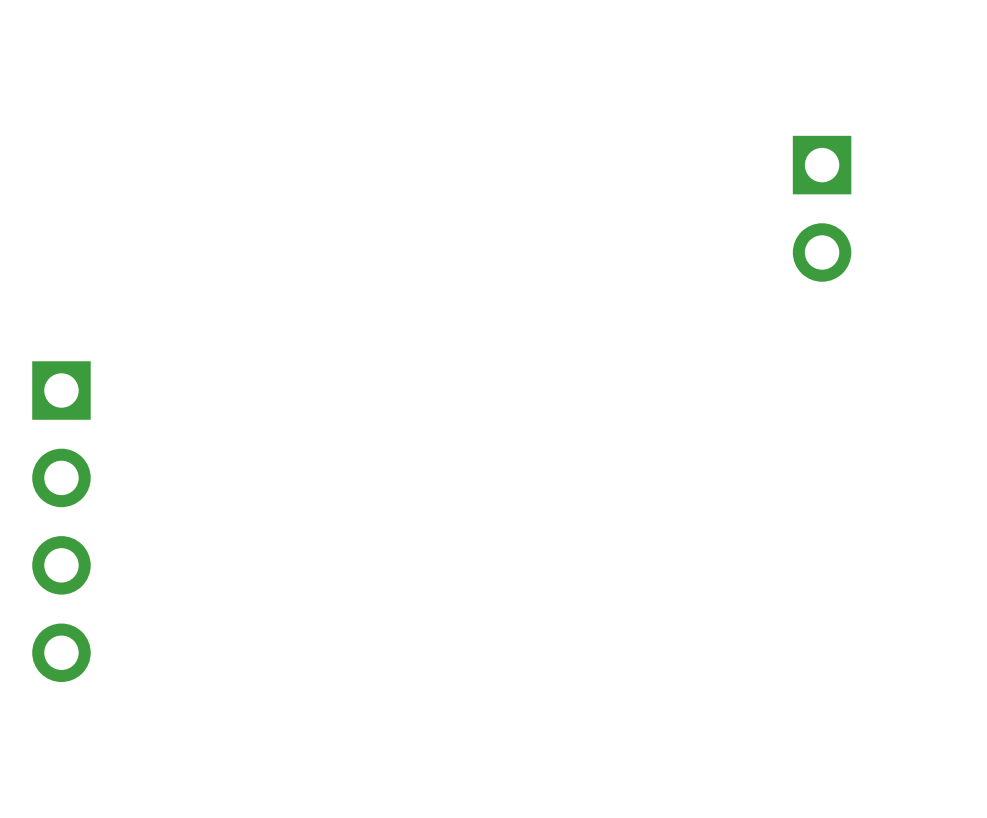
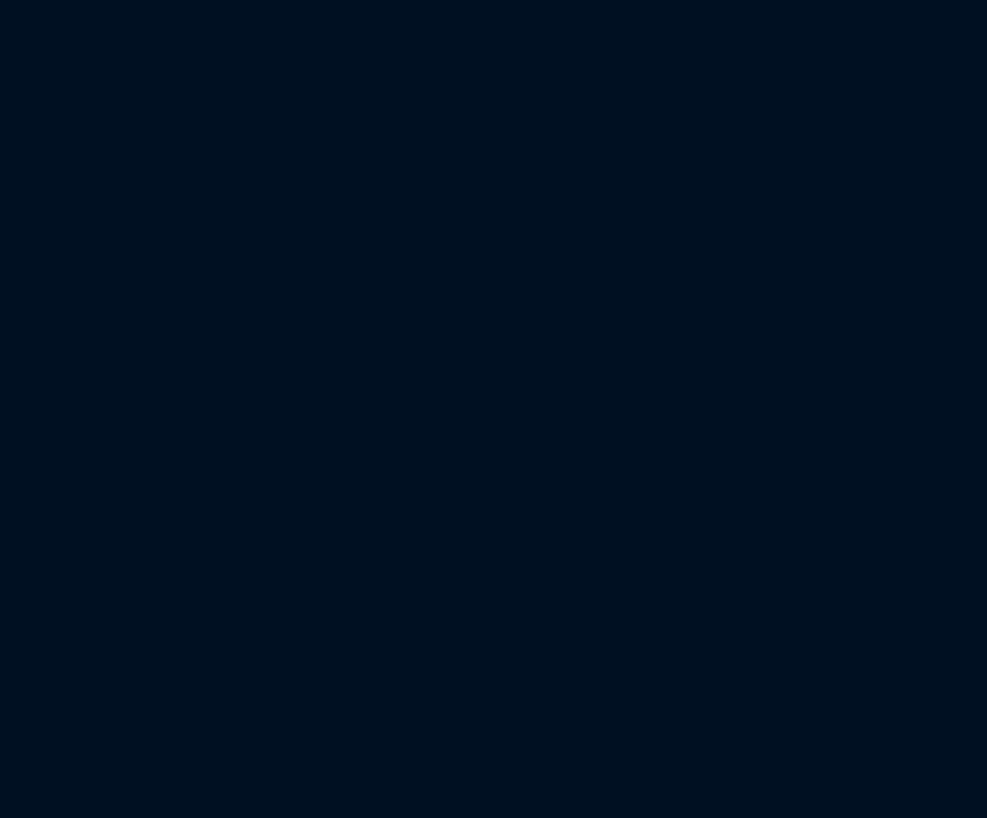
part: (822, 208) -> none
part: (61, 521) -> none

